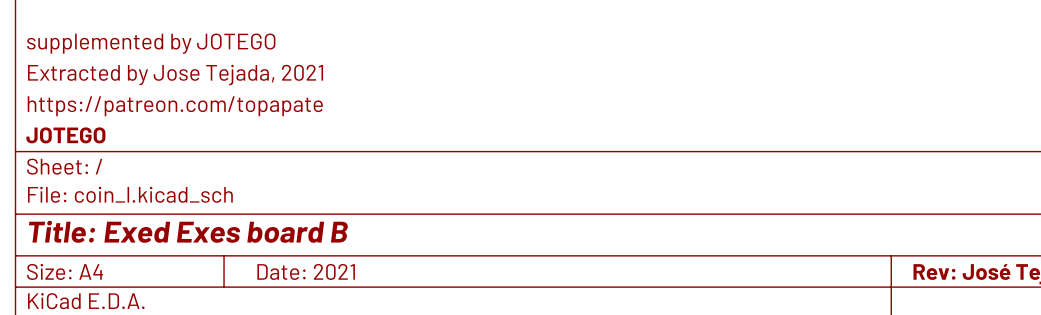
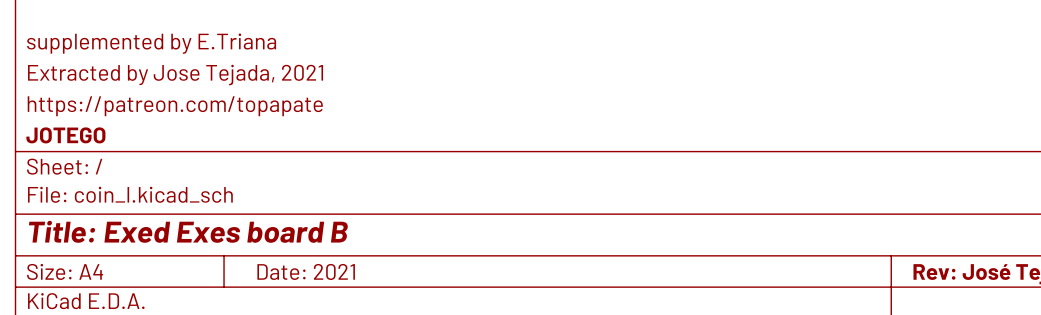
title block: supplemented by JOTEGO (151, 43) -> supplemented by E.Triana (151, 43)

